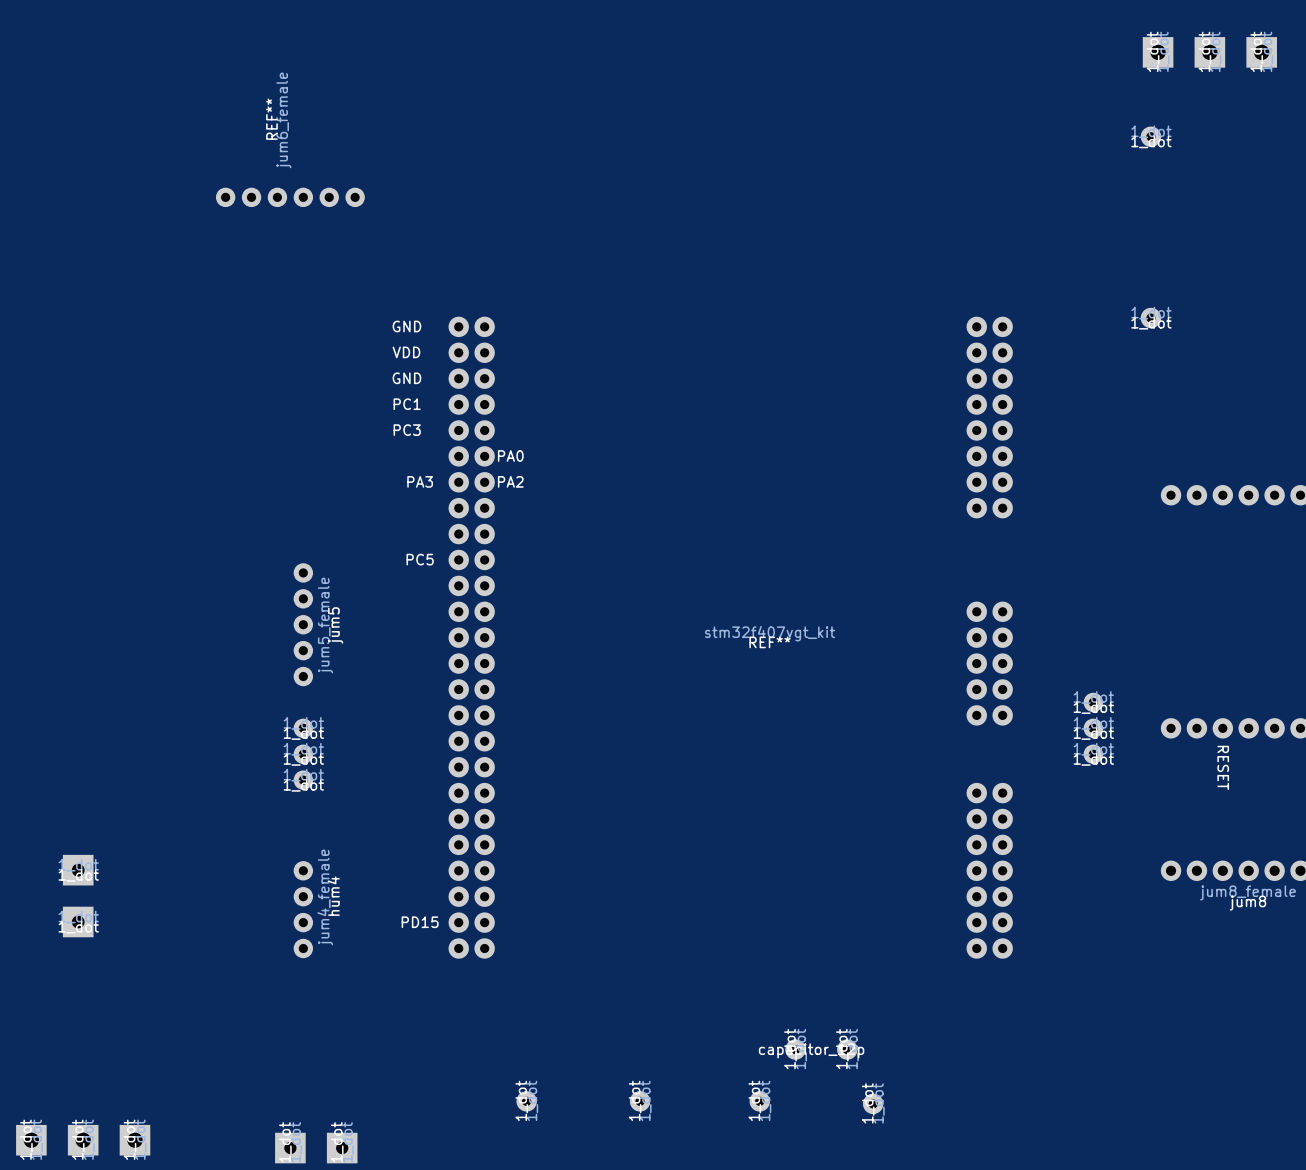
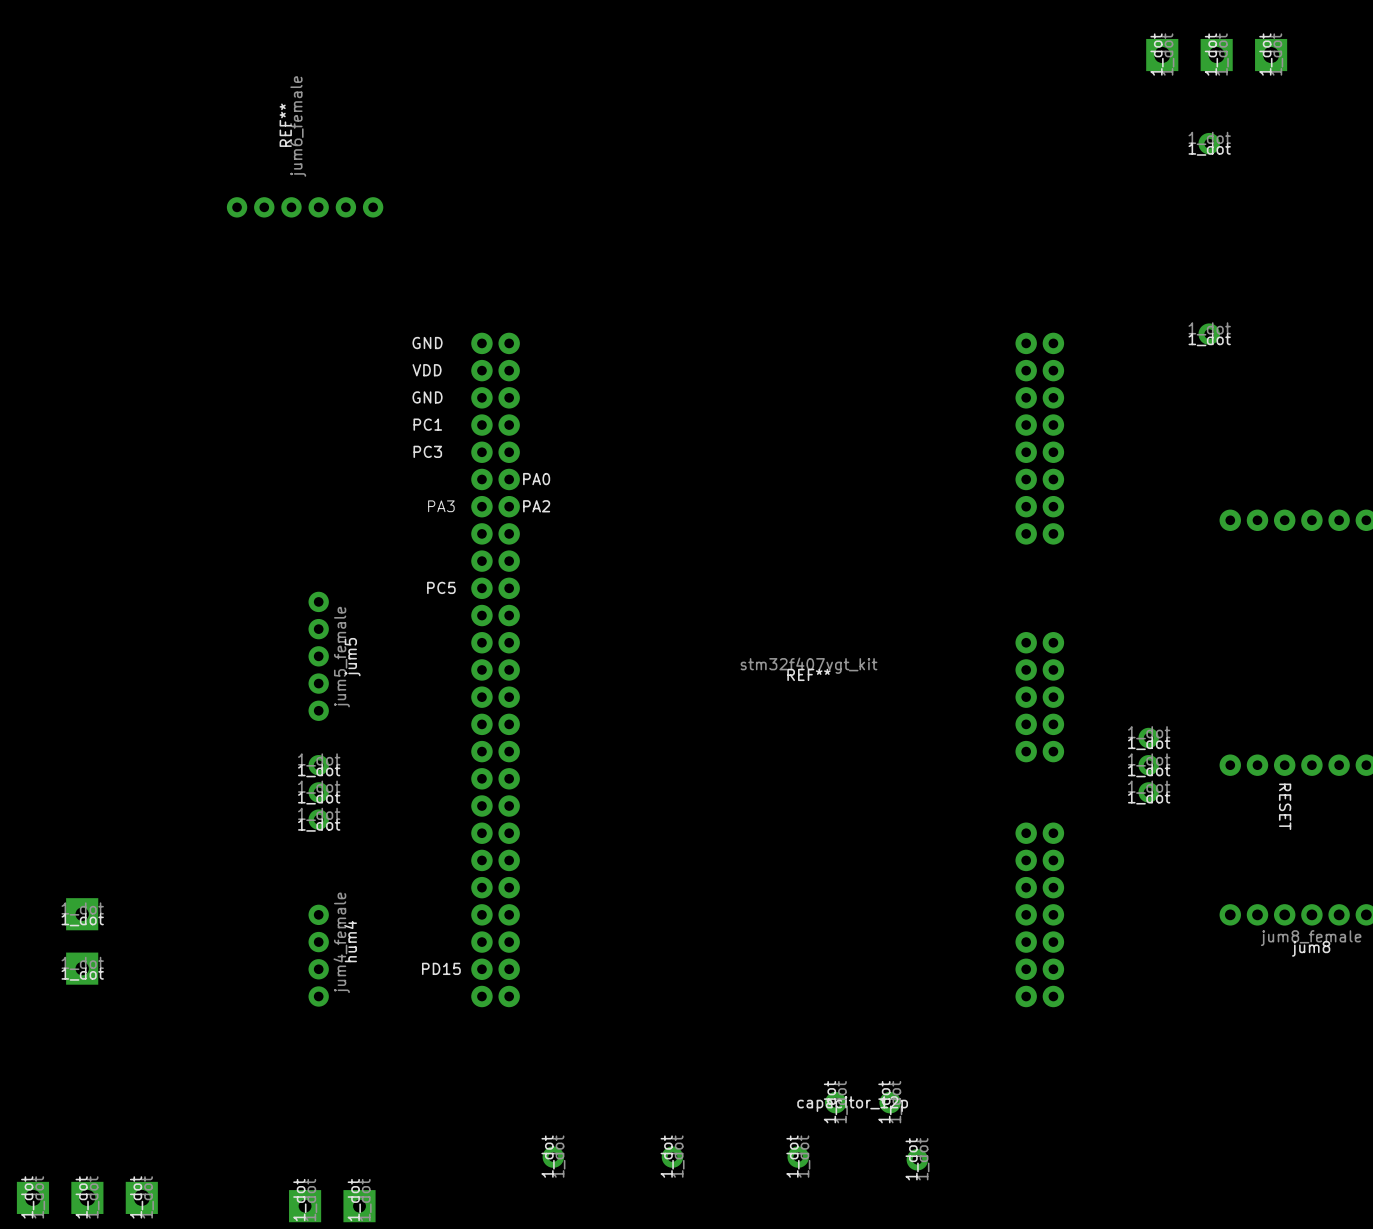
1_dot position: (1261, 52) -> (1162, 55)

